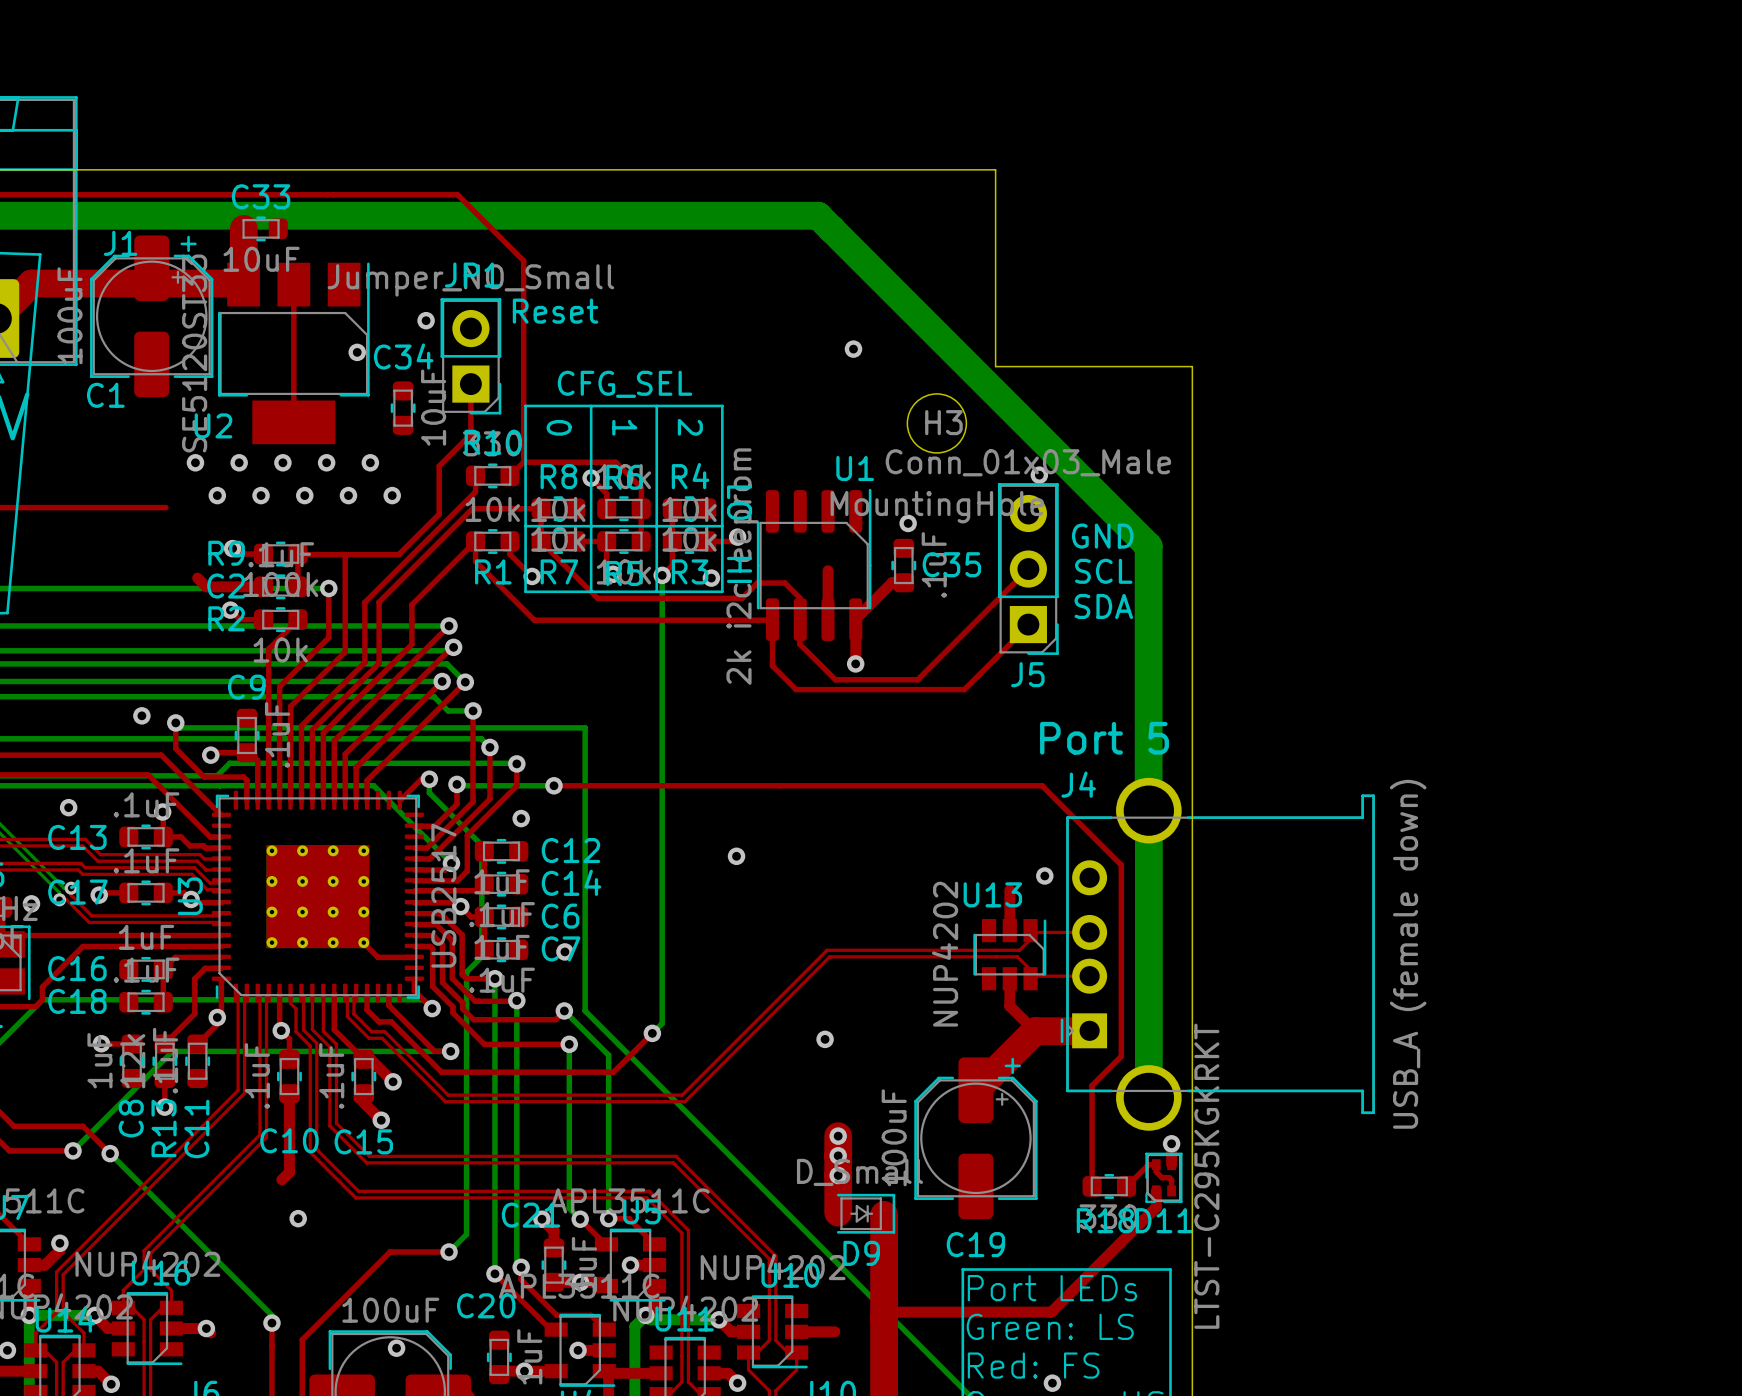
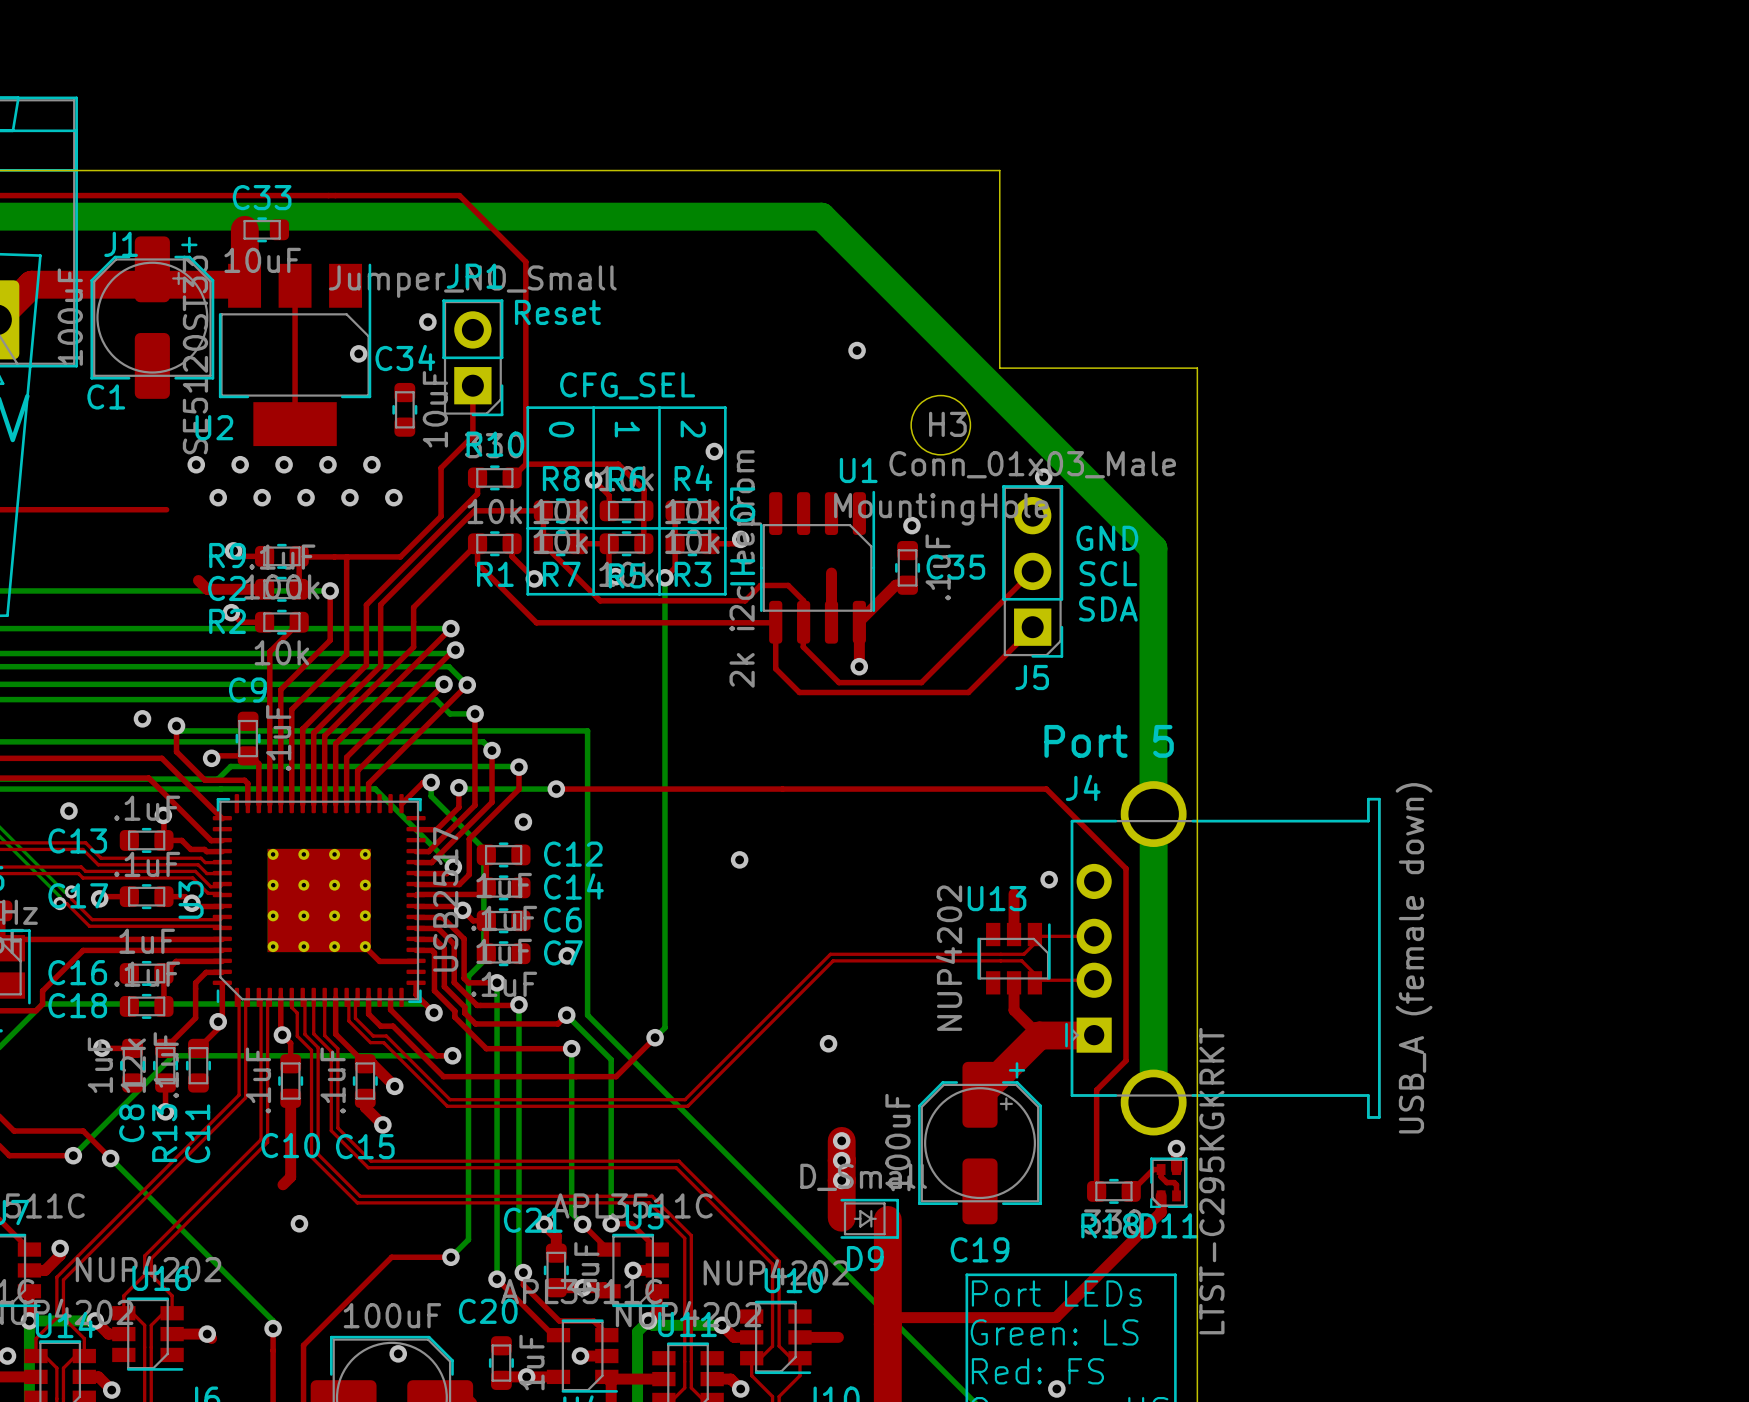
via position: (711, 578) -> (714, 451)
via: (31, 903) -> none

